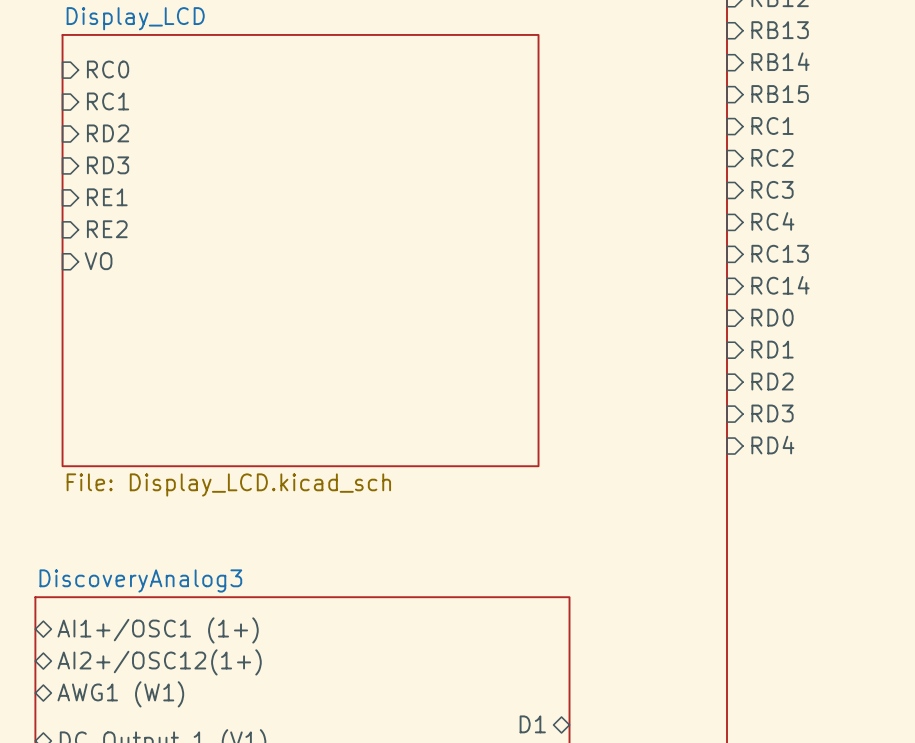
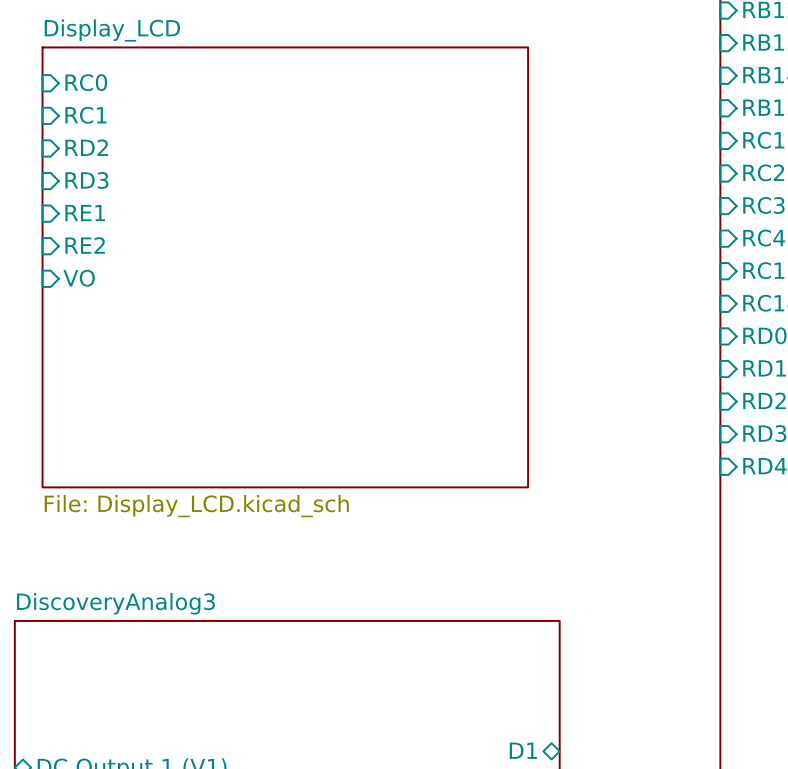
sheet pin: AI1+/OSC1 (1+) (158, 630) -> none
sheet pin: AI2+/OSC12(1+) (159, 662) -> none
sheet pin: AWG1 (W1) (120, 694) -> none

